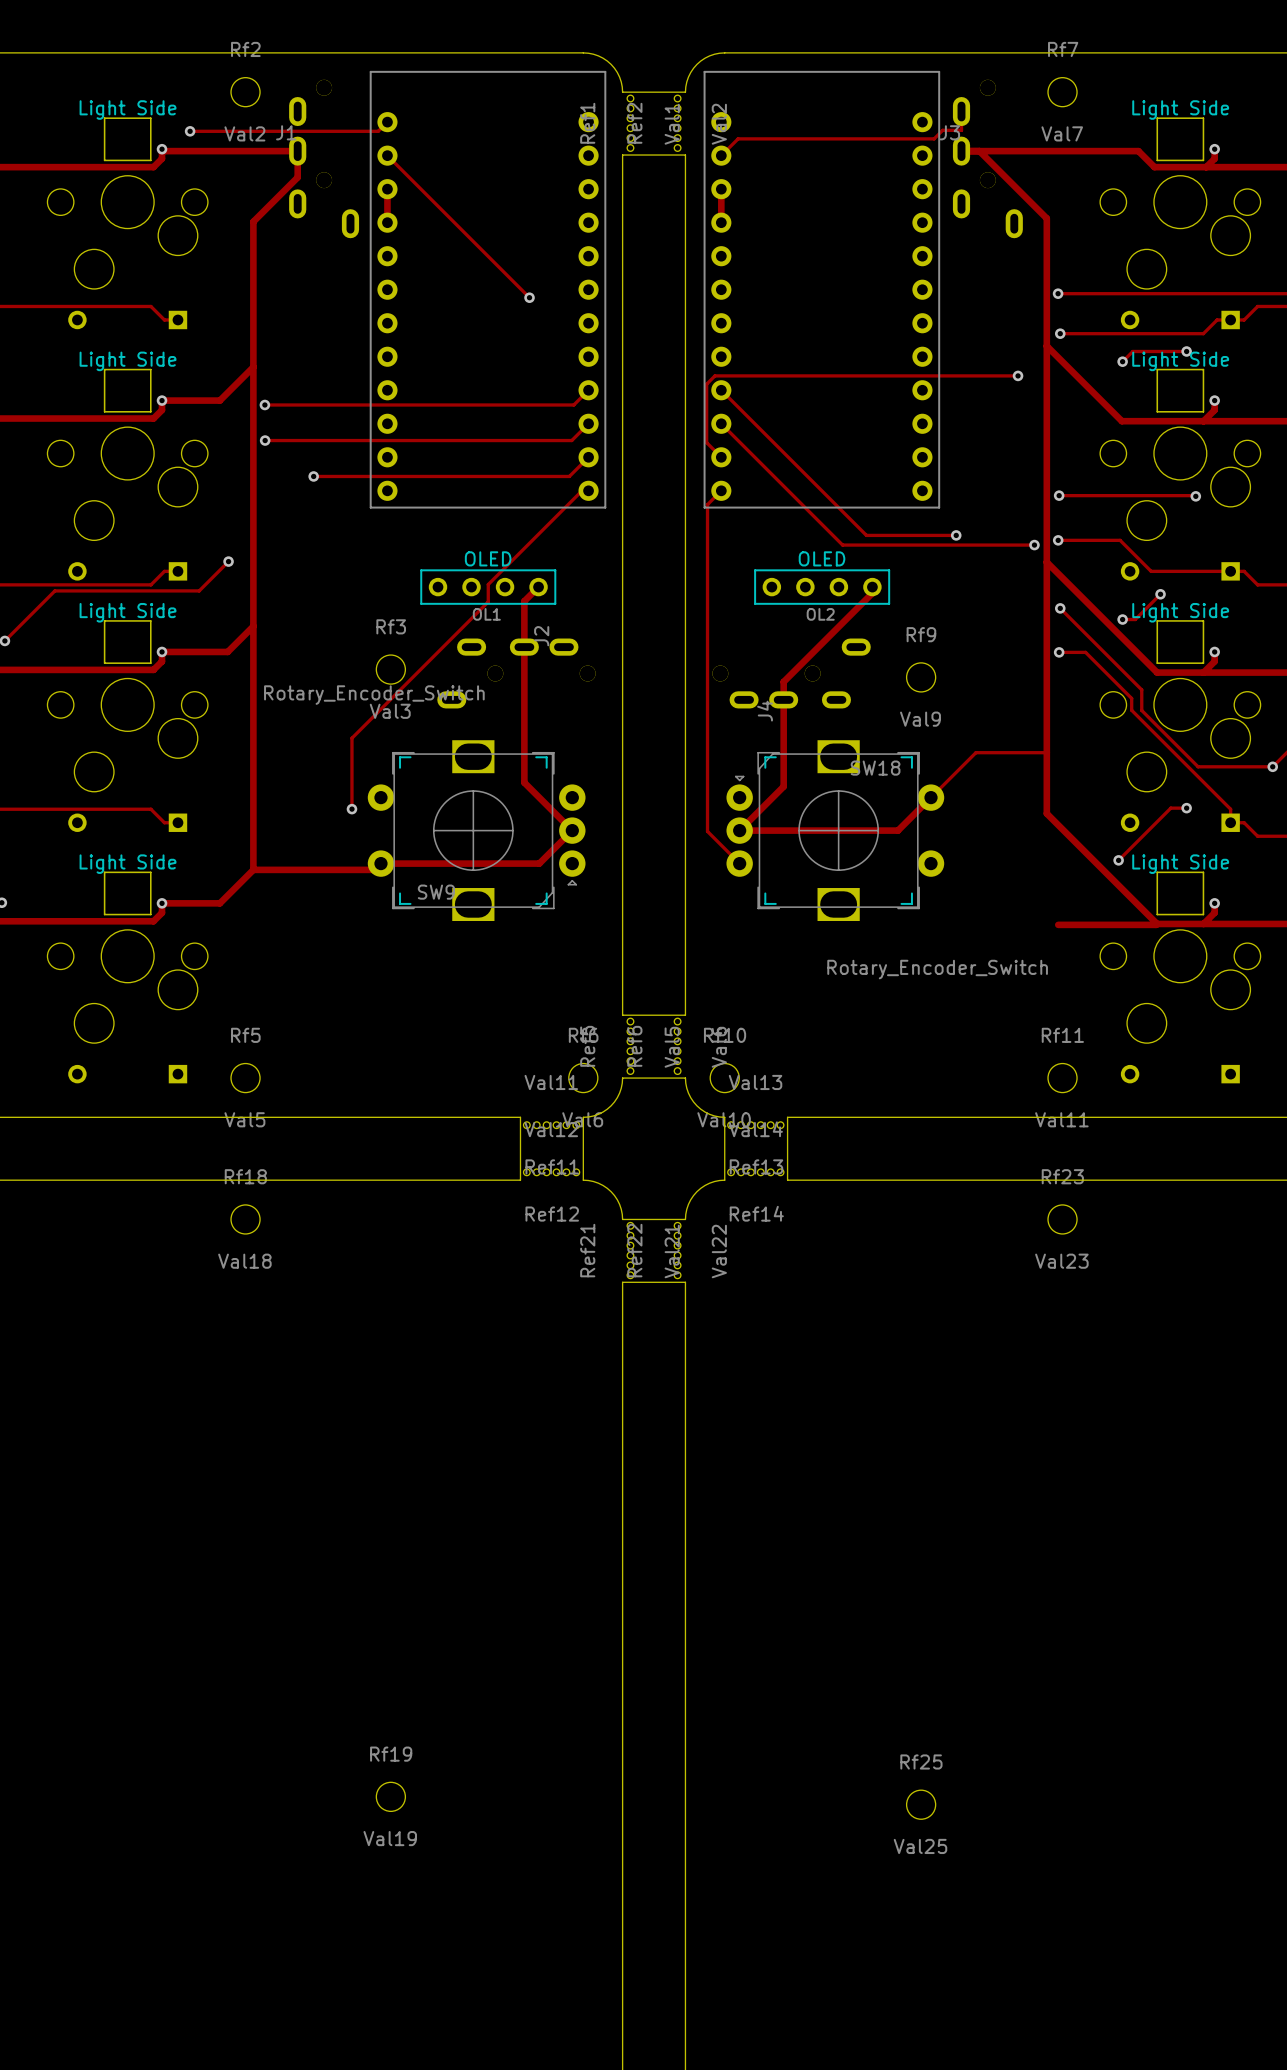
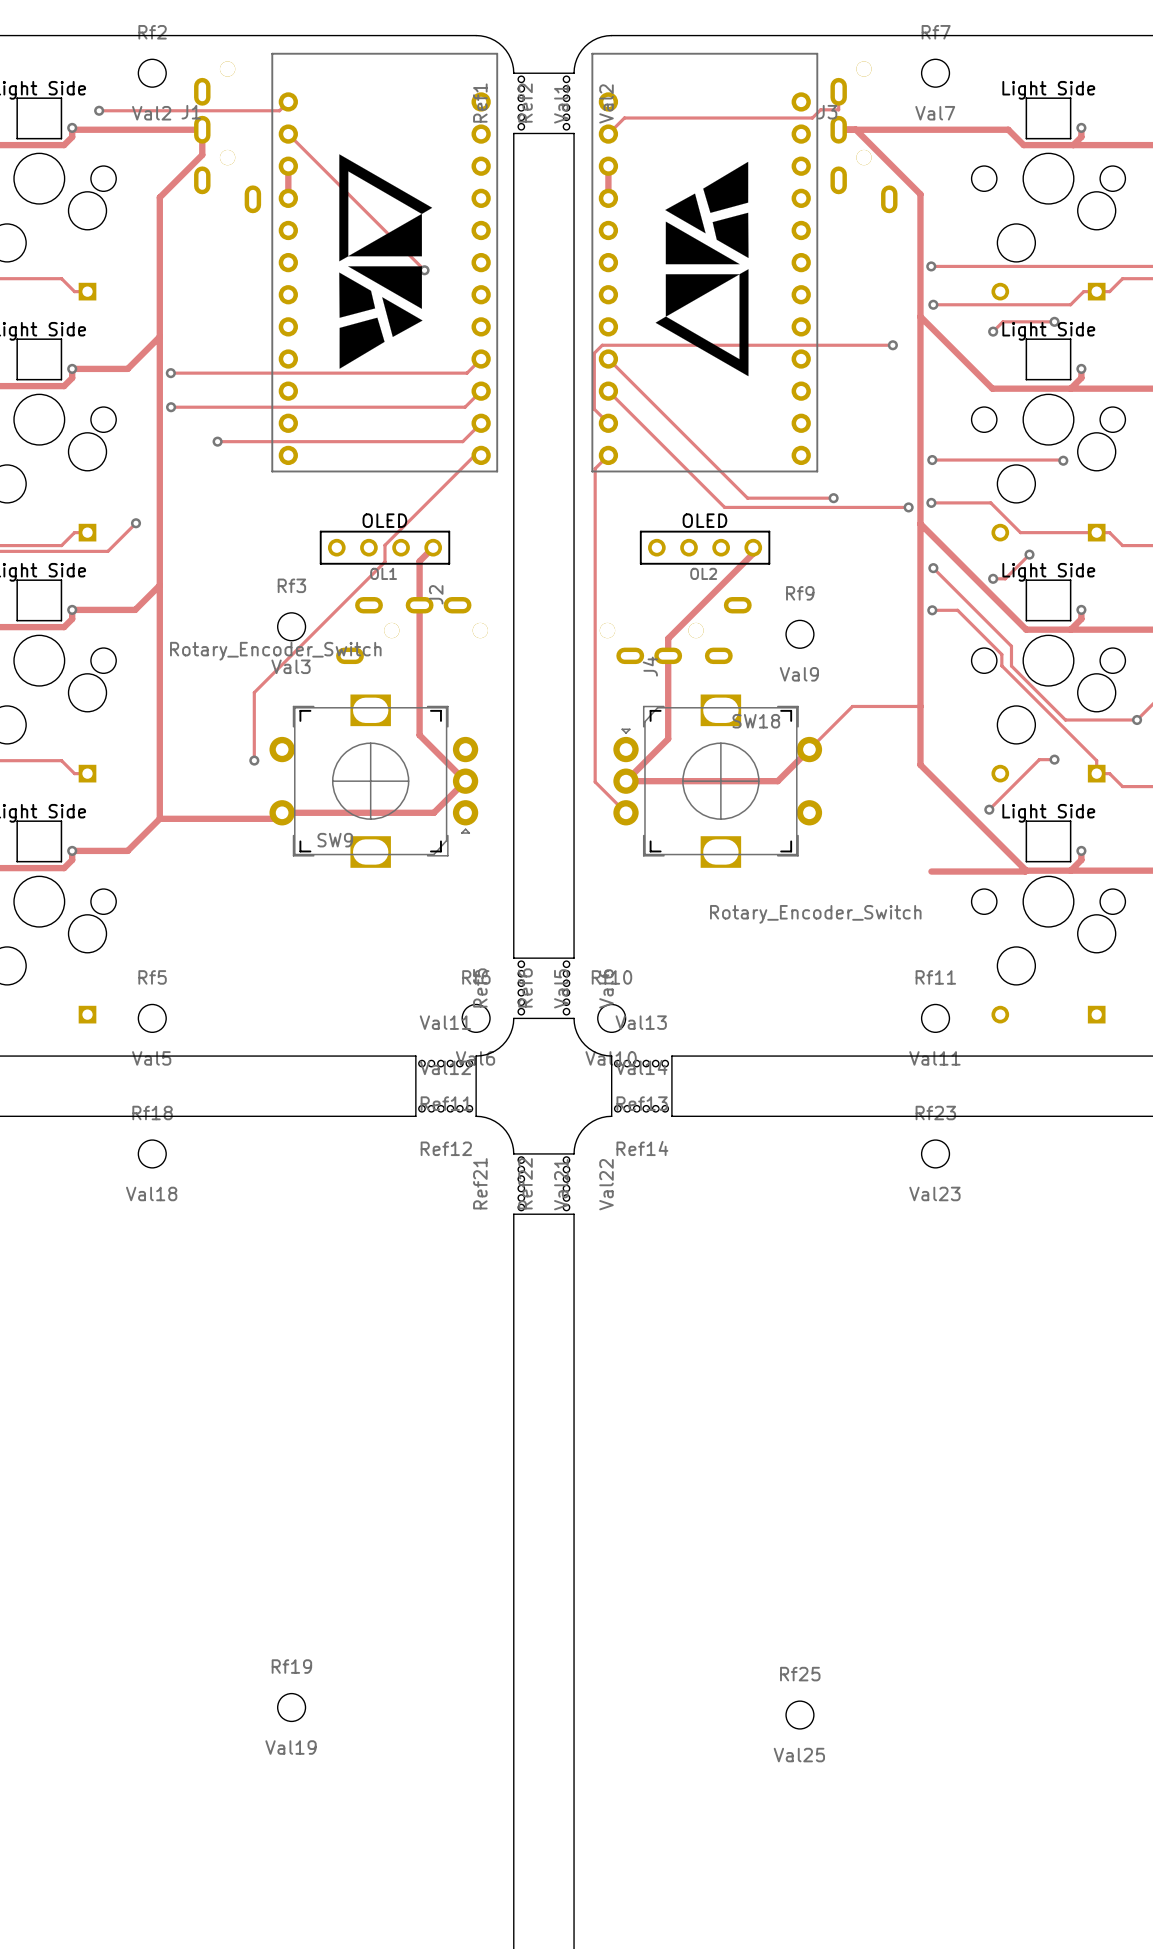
drawing: none -> [339, 154, 433, 369]
drawing: none -> [655, 161, 749, 377]

